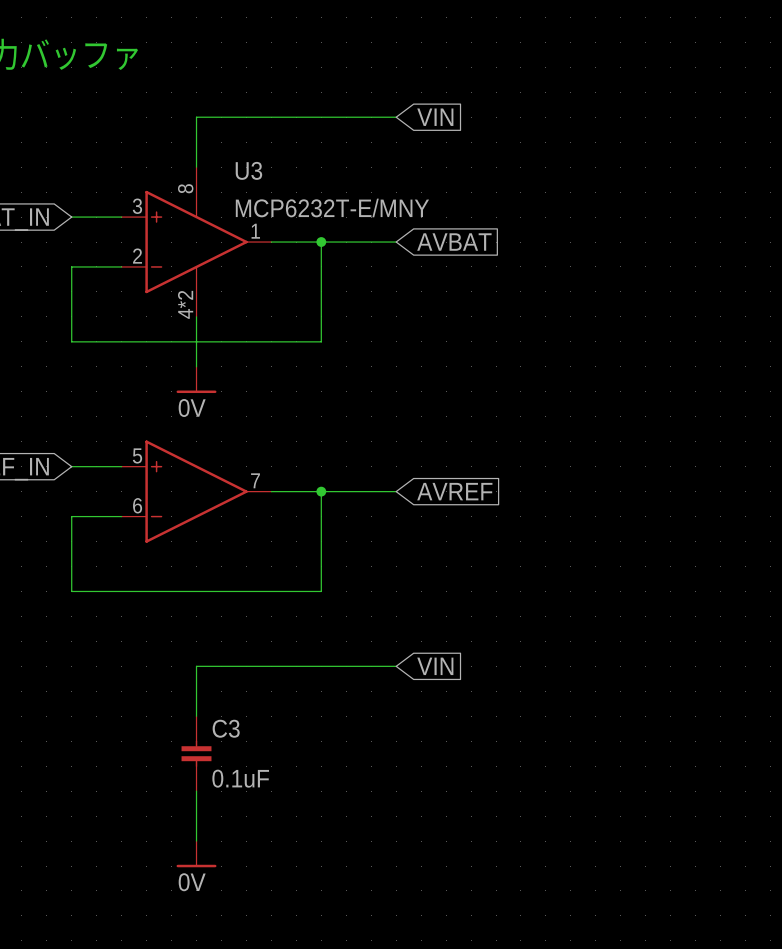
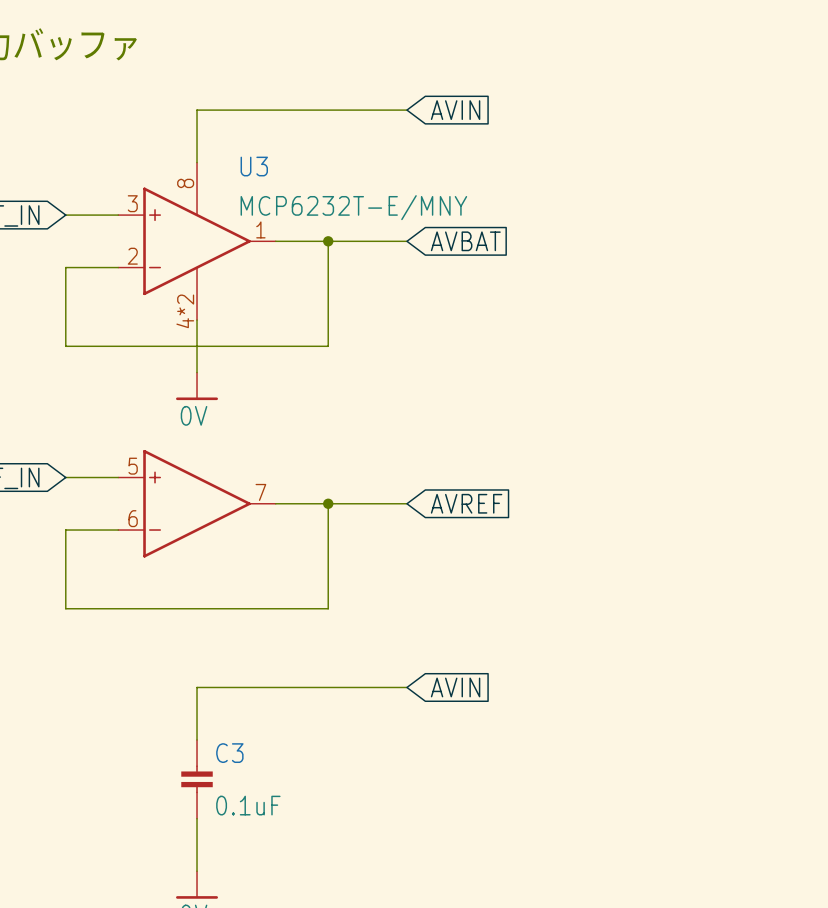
global label: VIN (435, 117) -> AVIN (455, 110)
global label: VIN (435, 666) -> AVIN (455, 687)

